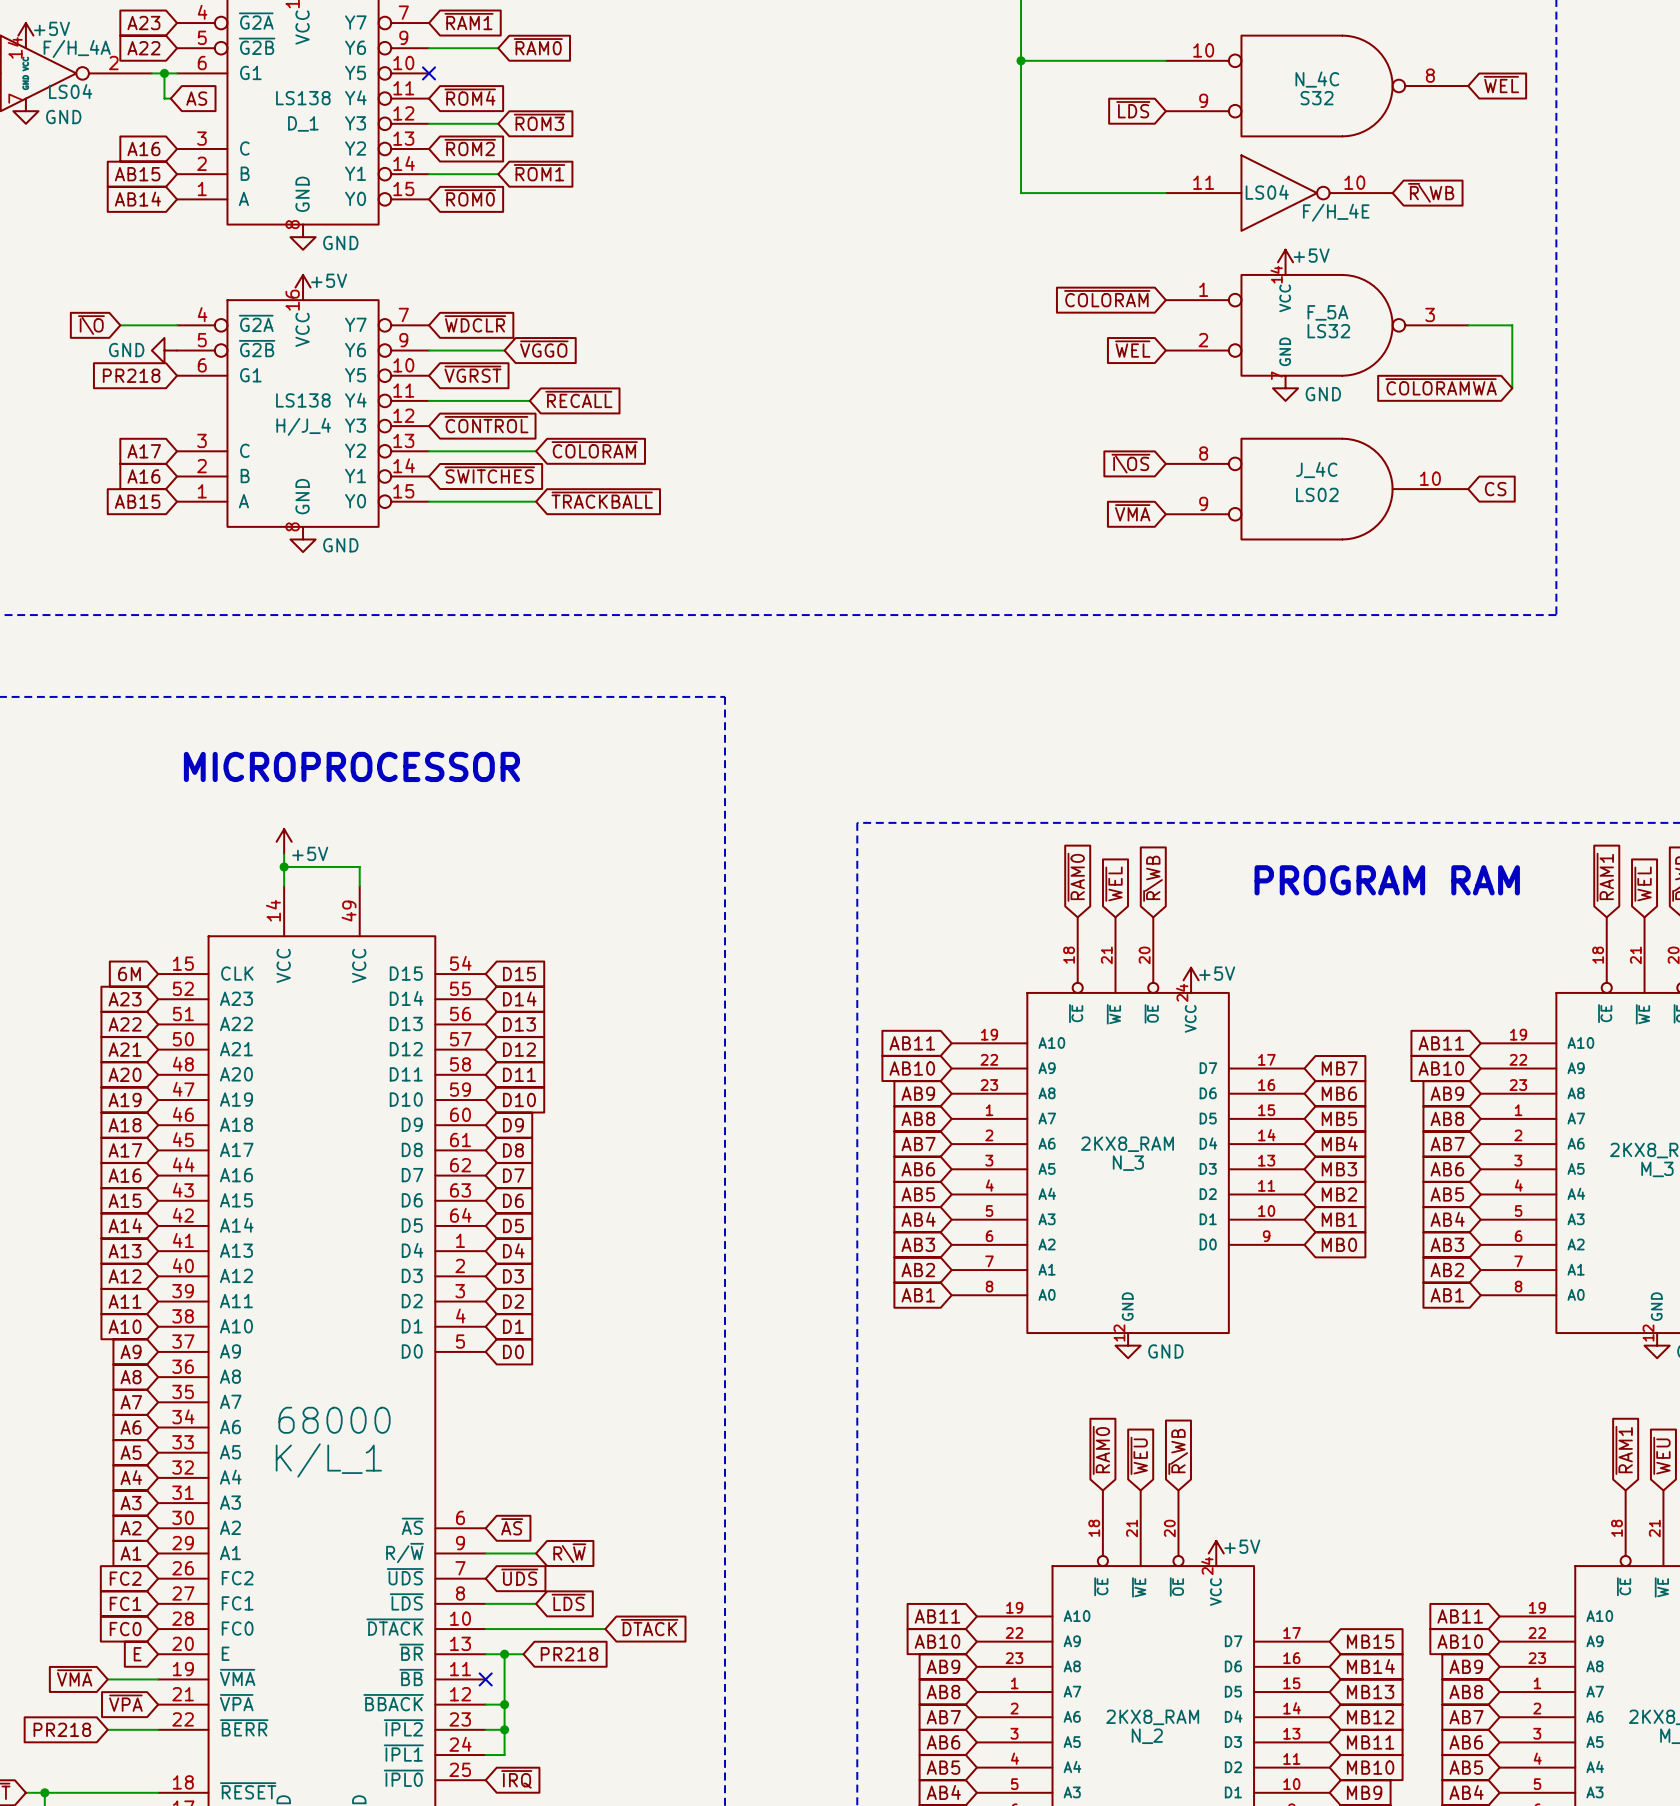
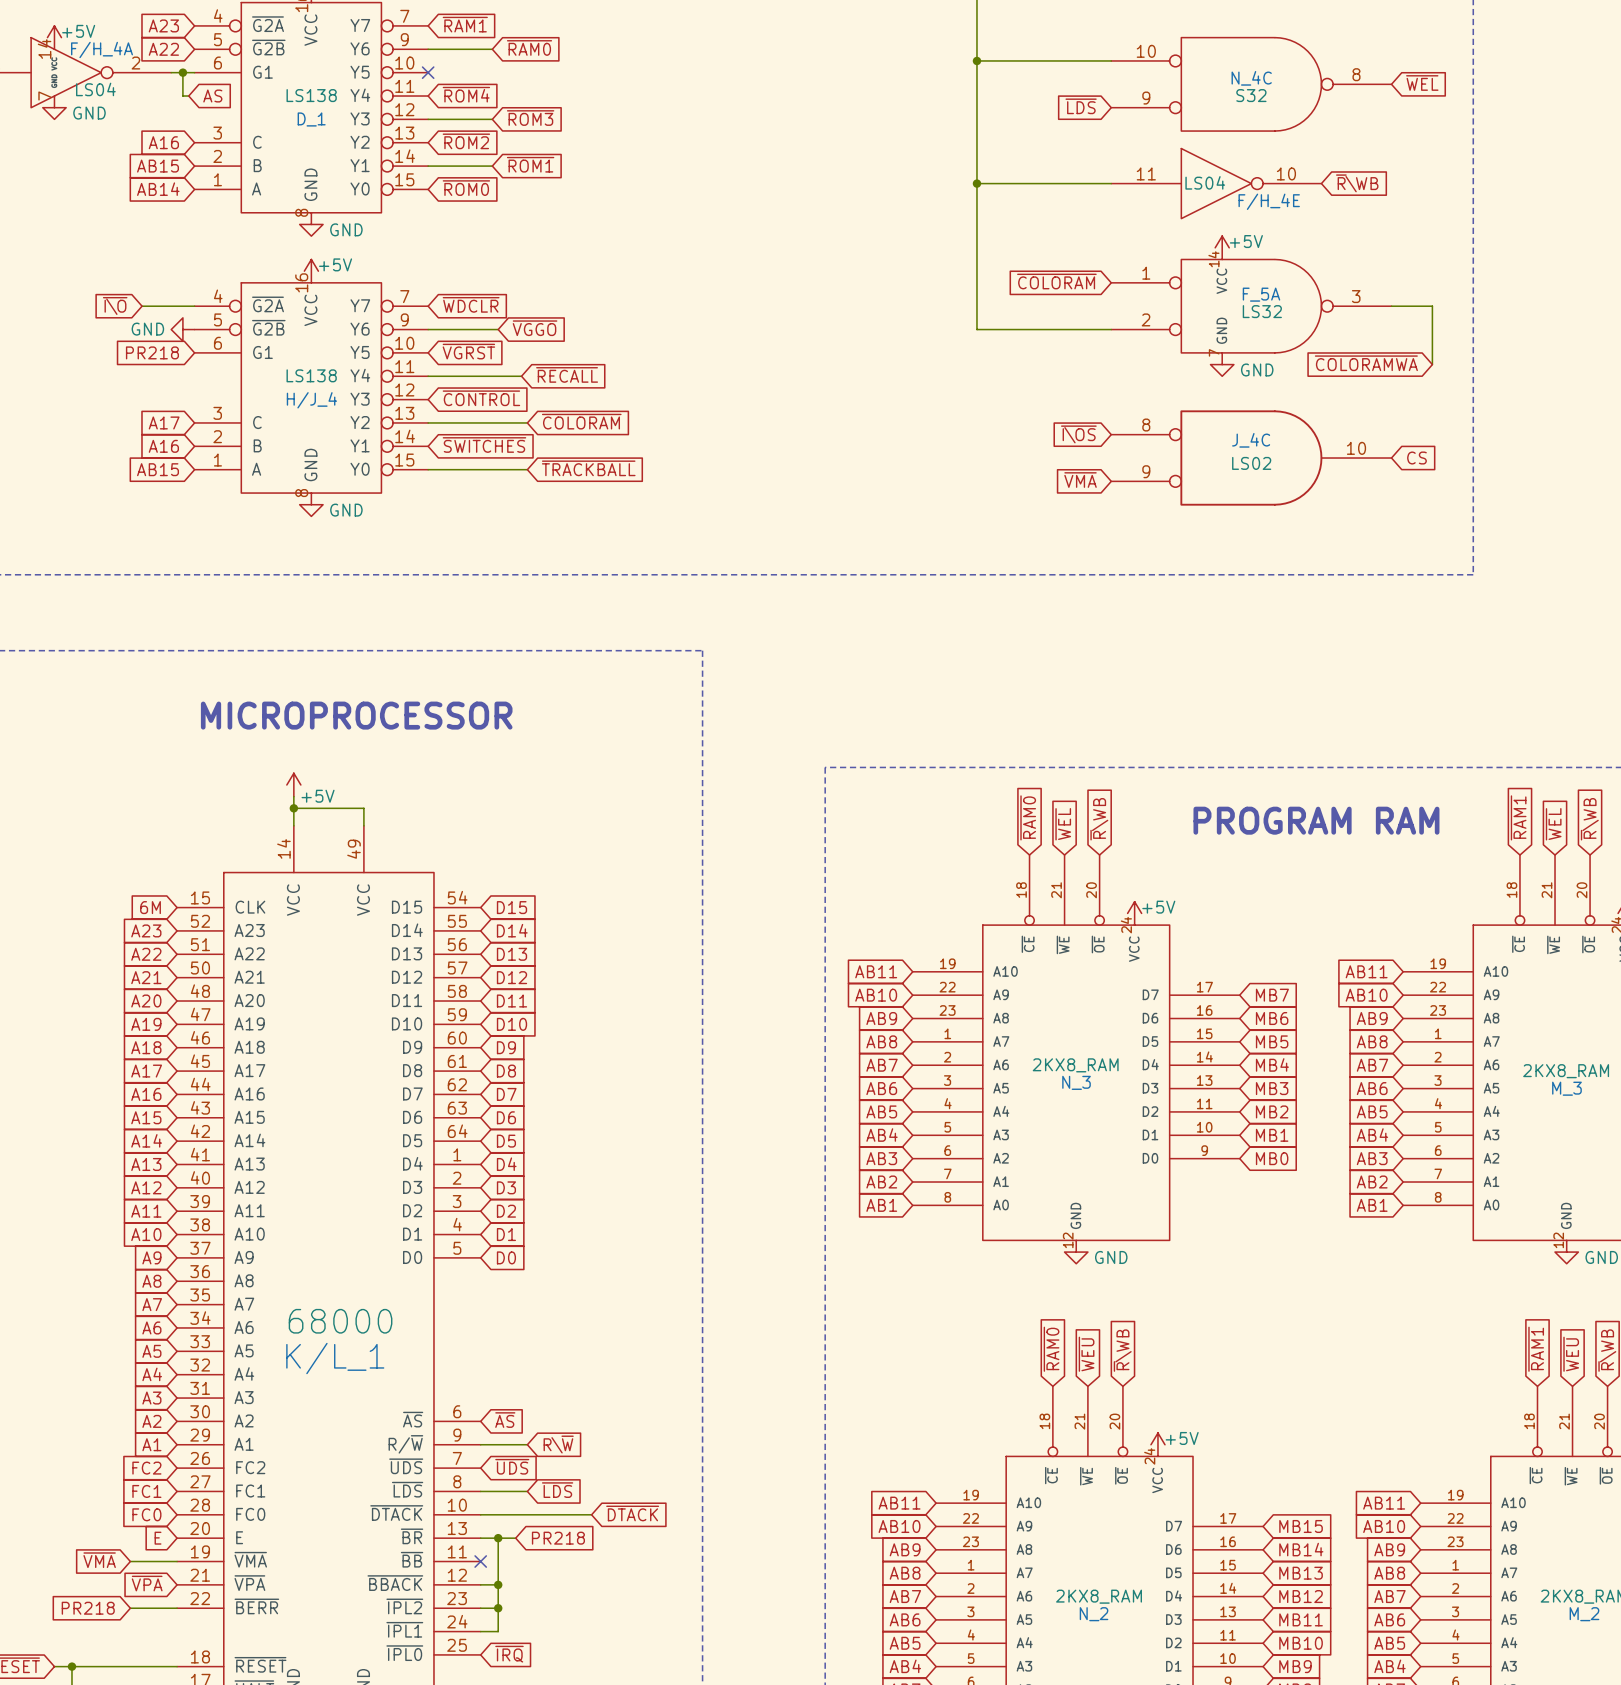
wire: none -> (976, 183) (976, 329) (1111, 329)
junction: none -> (976, 183)
global label: ~{WEL} (1132, 349) -> none

